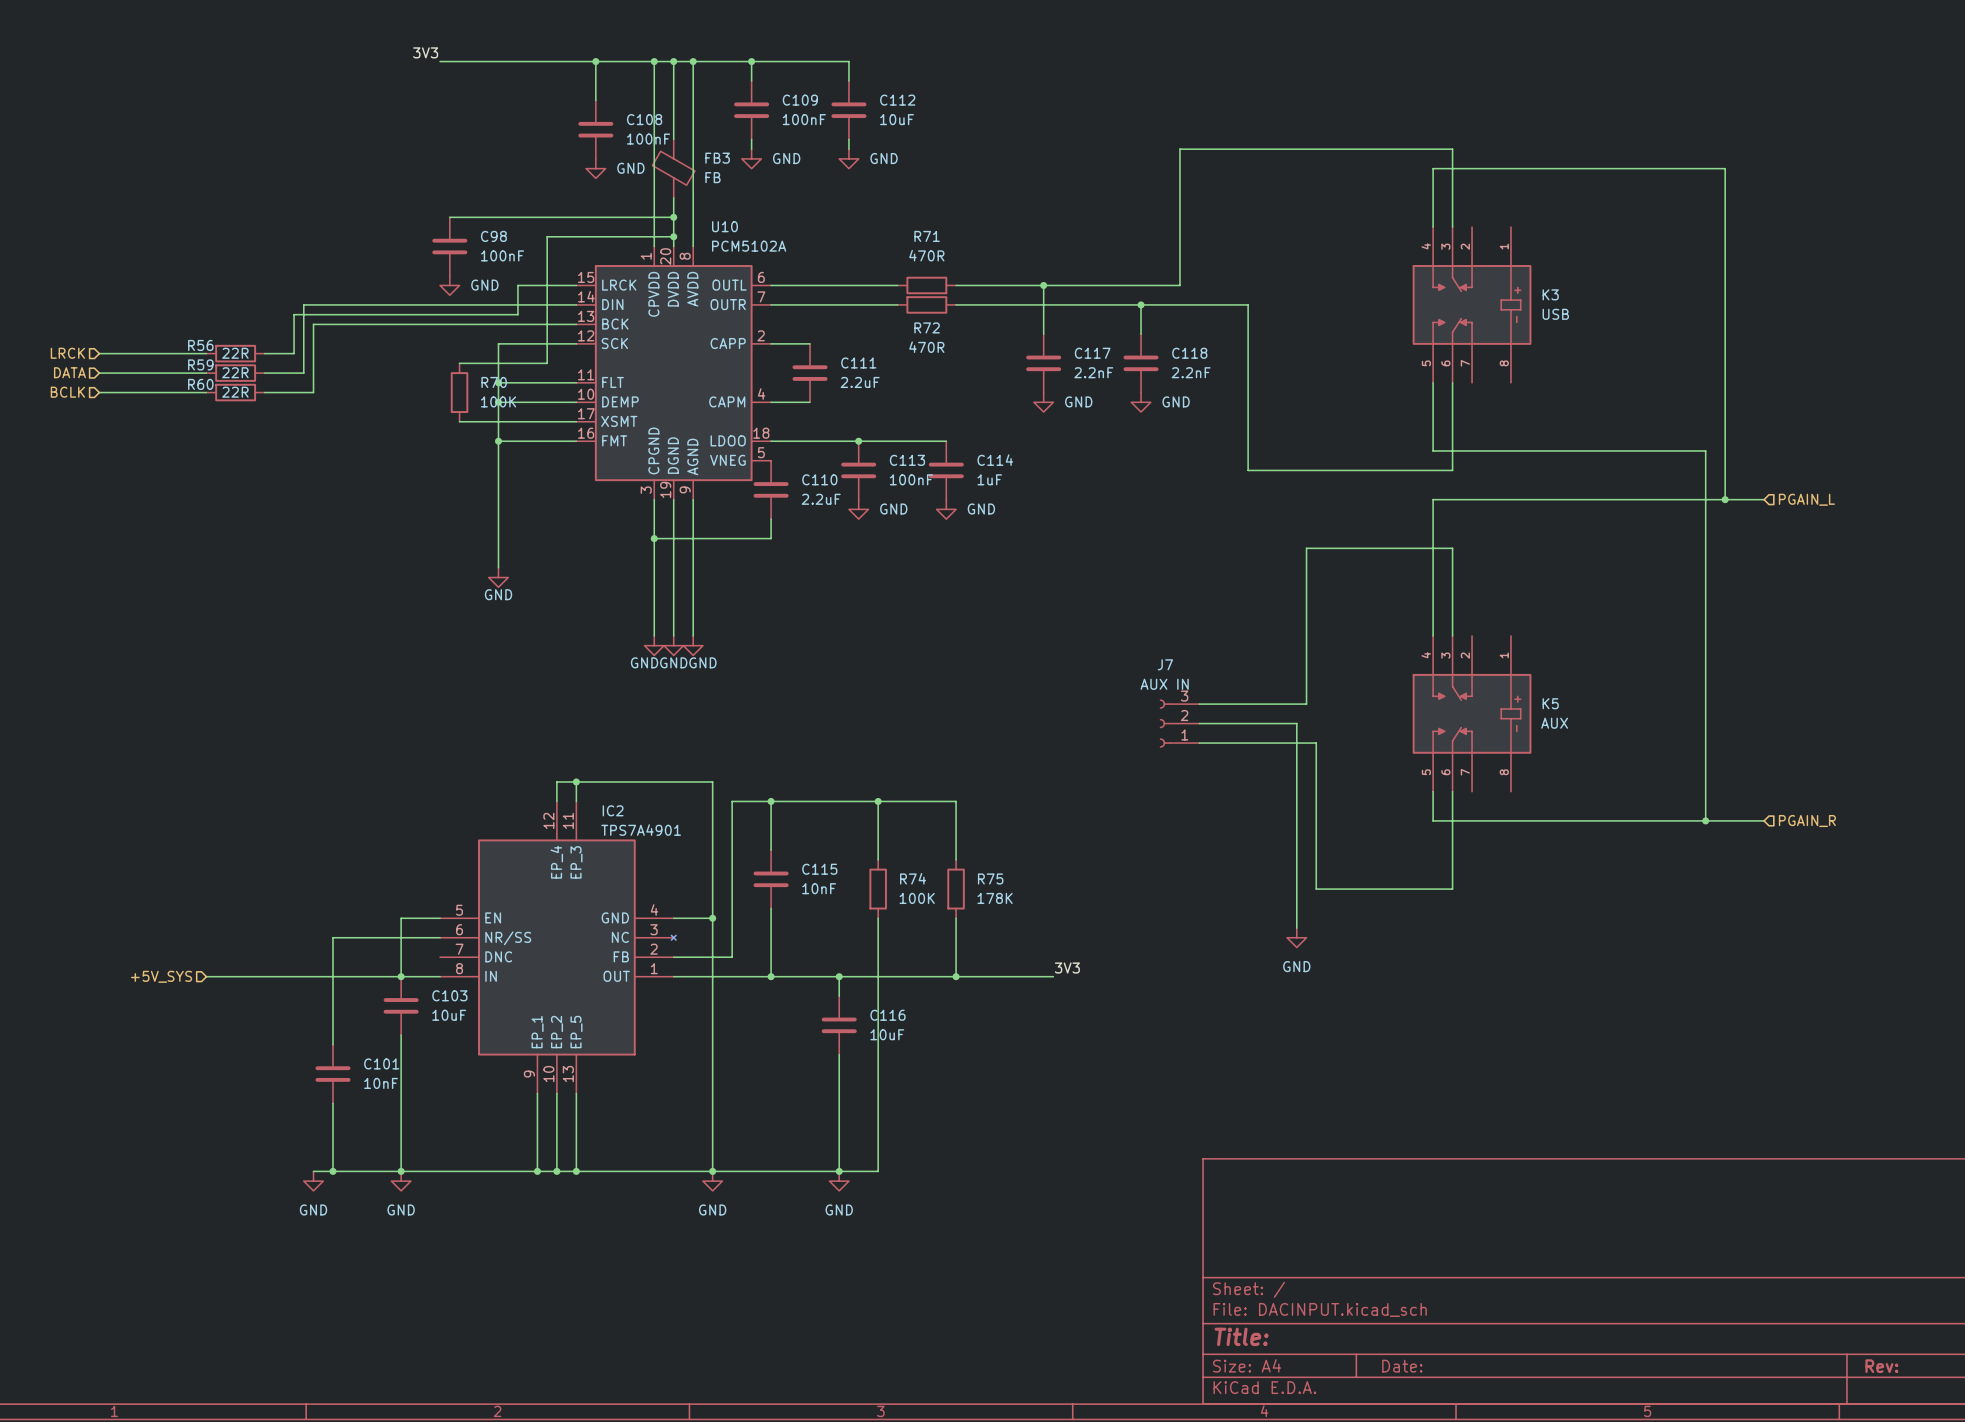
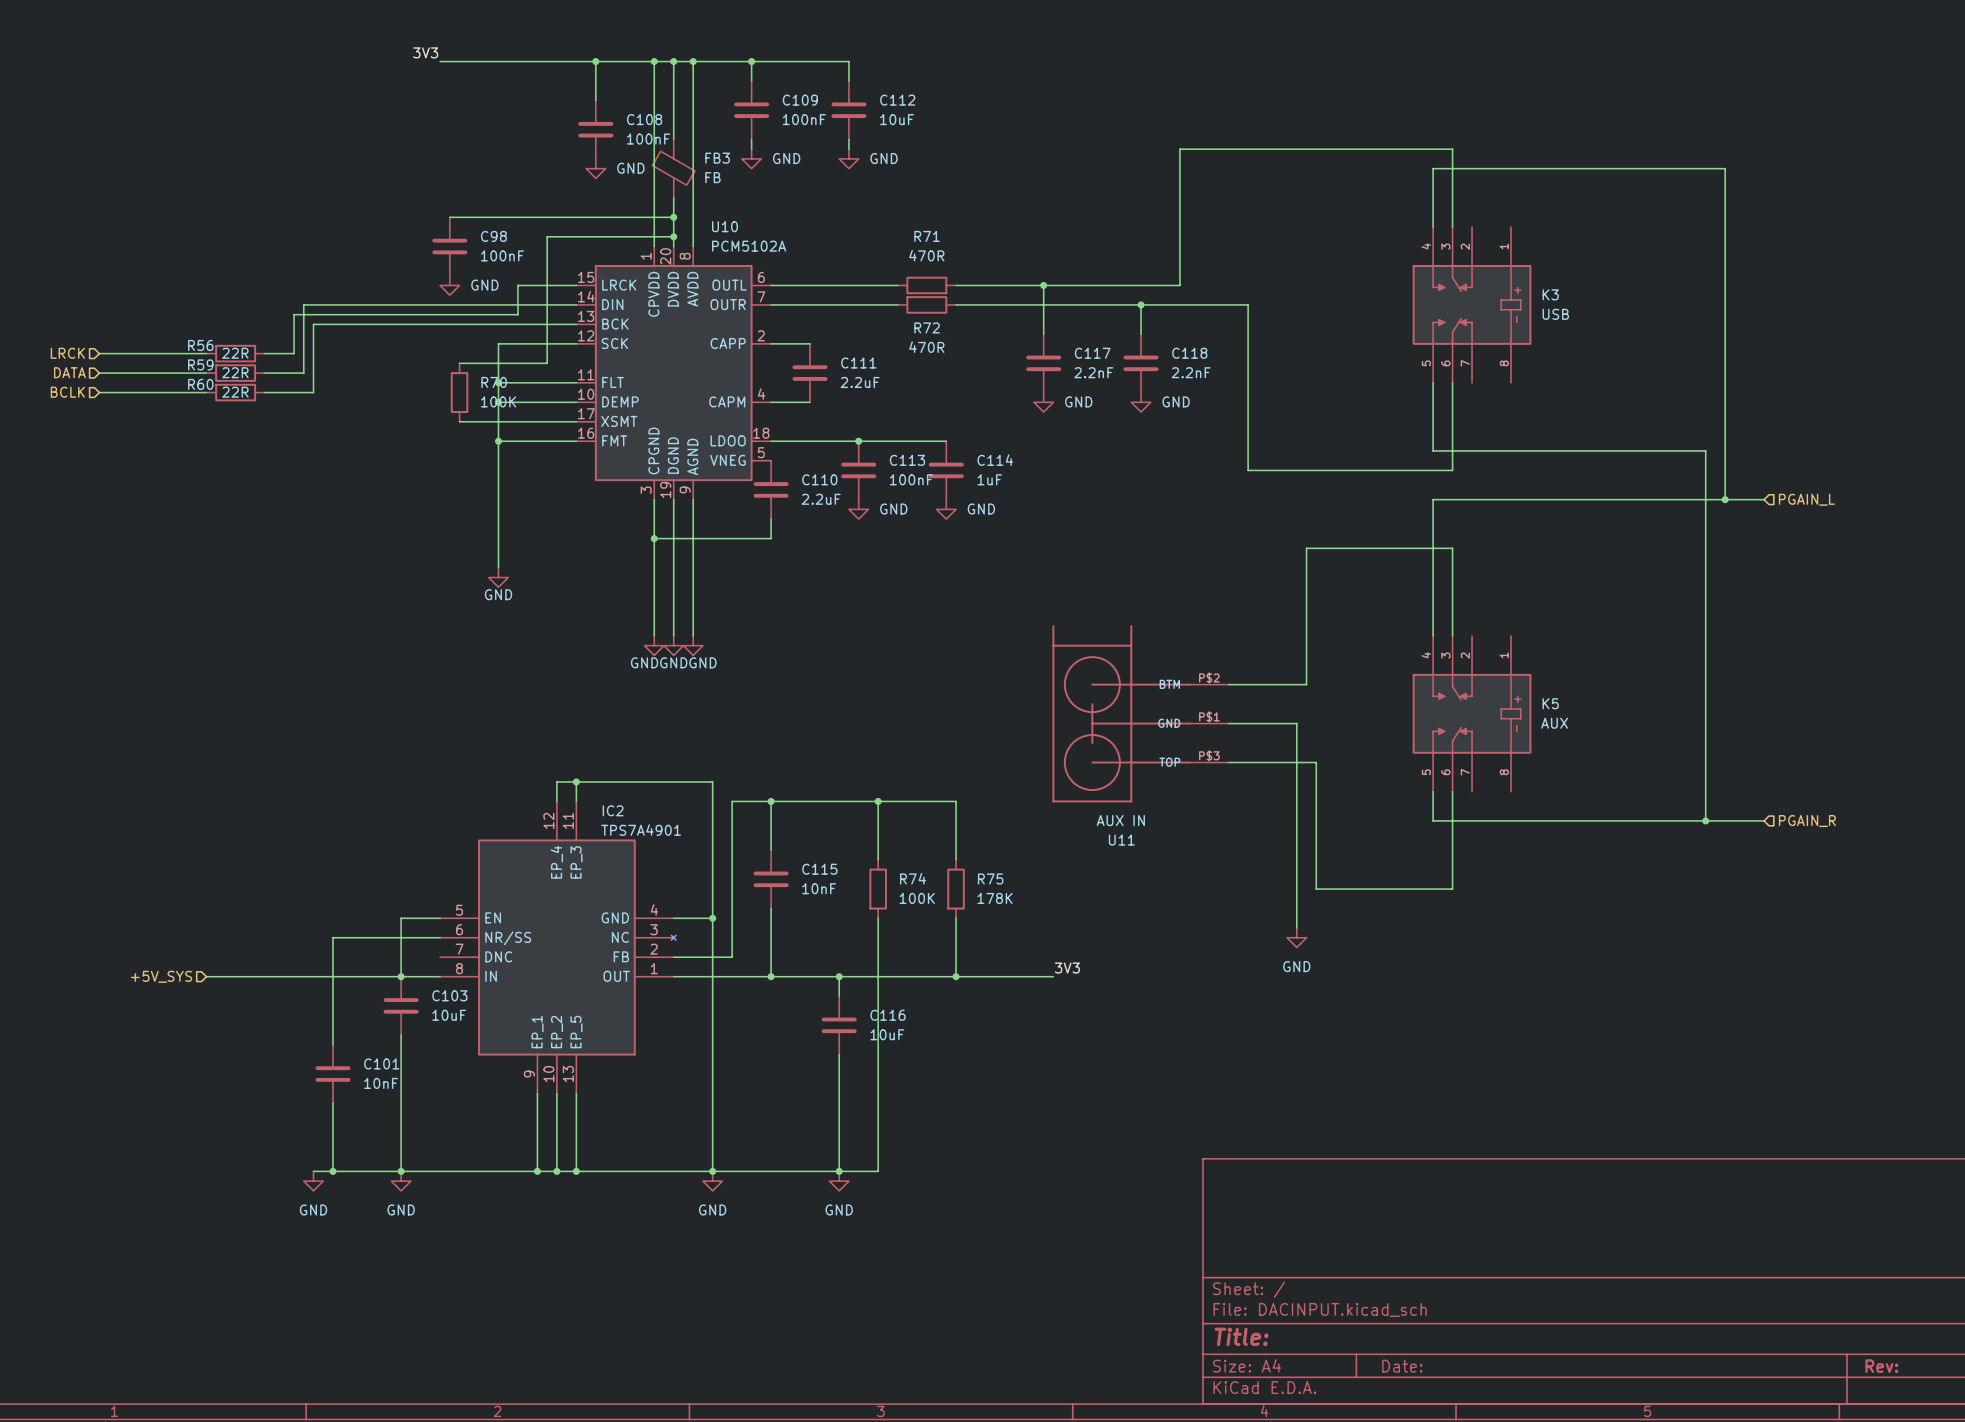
wire: (1306, 684) (1306, 704) (1199, 704) -> (1306, 684) (1228, 684)
U11: none -> AUX IN (1140, 713)
J7: AUX IN (1179, 723) -> none
wire: (1199, 743) (1316, 743) (1316, 762) -> (1228, 762) (1316, 762)

